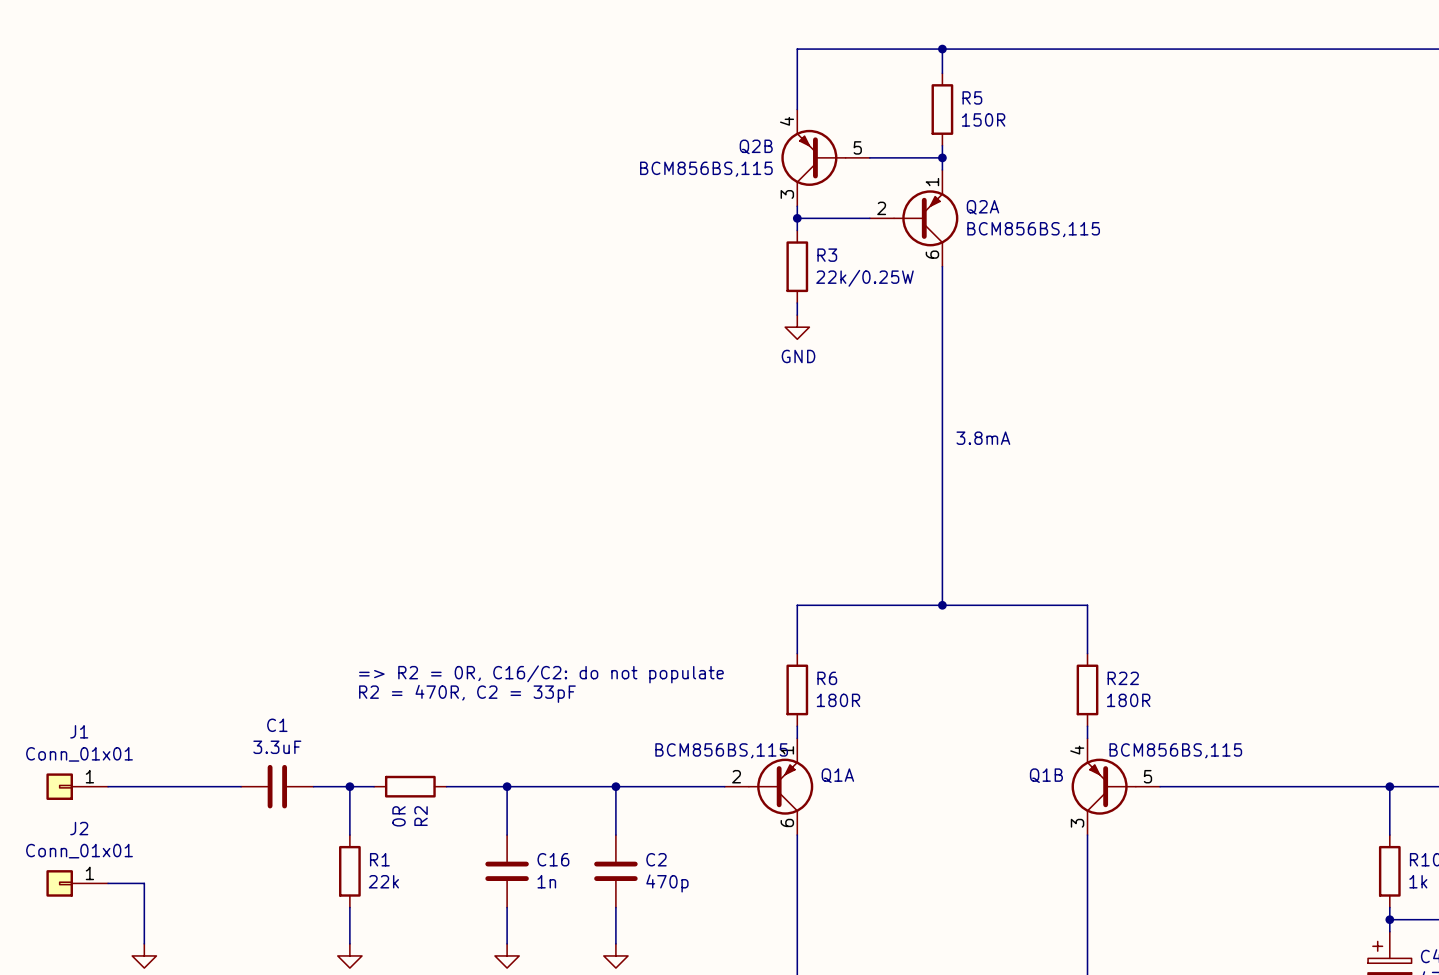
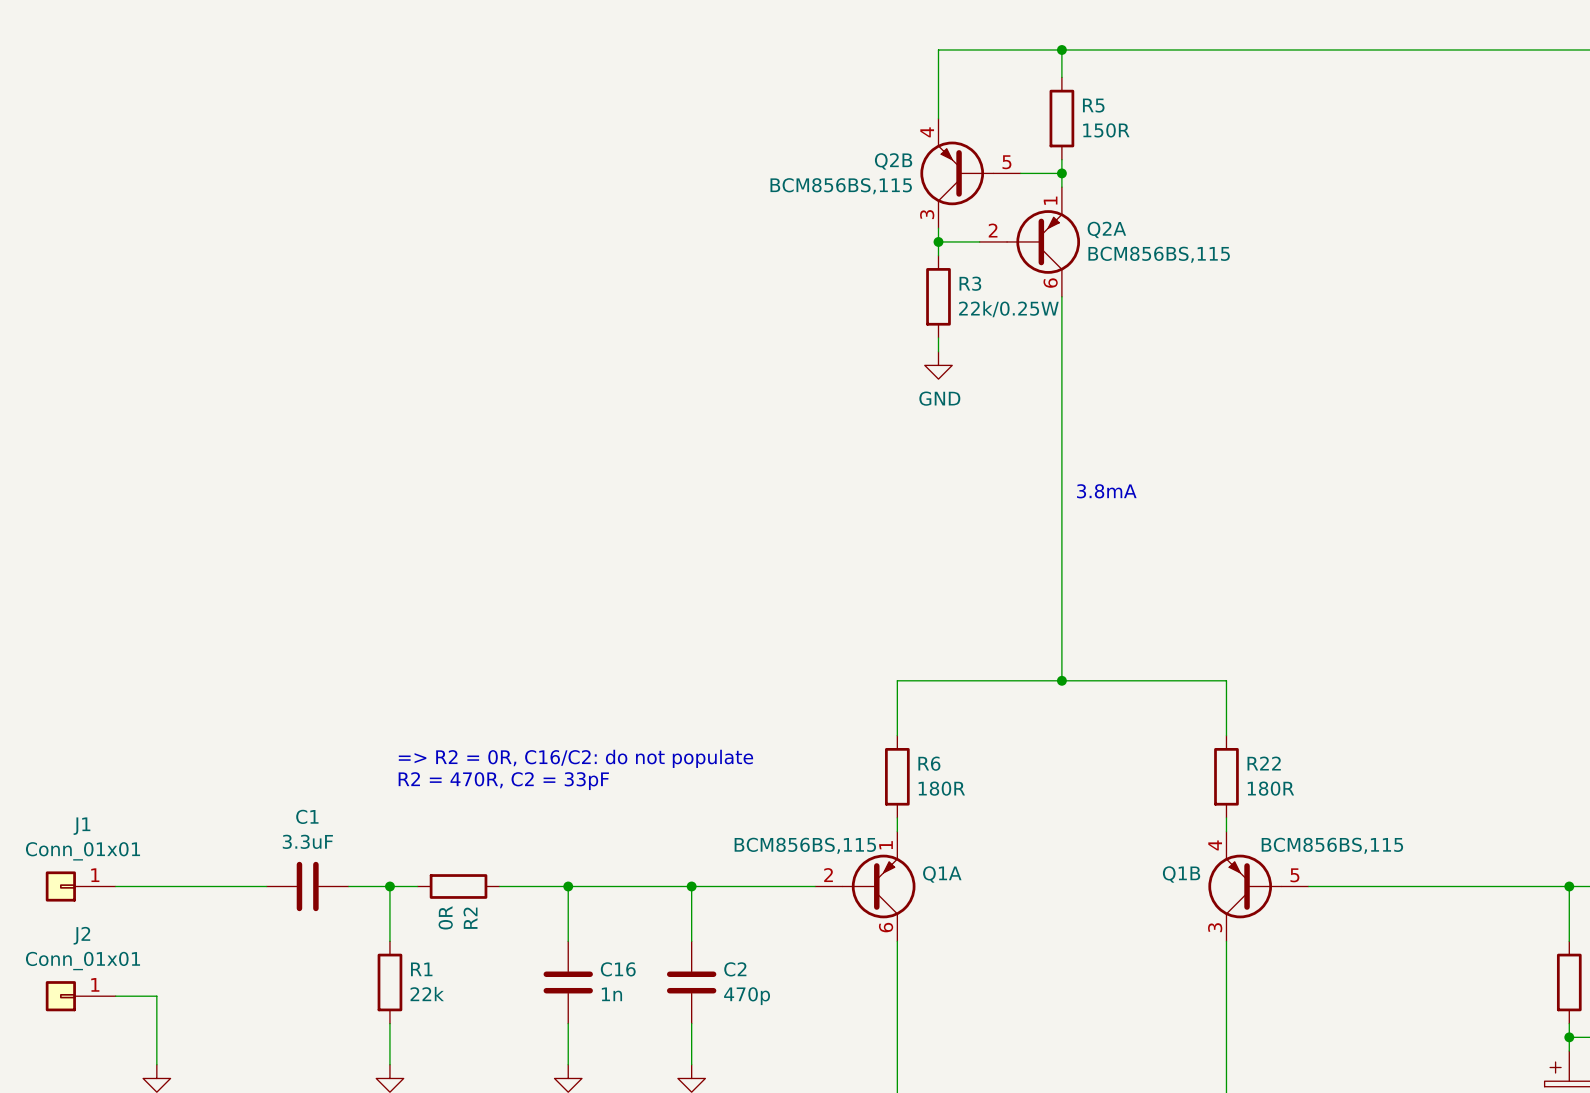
wire: (833, 49) (797, 49) (797, 109) -> (938, 49) (938, 118)
Q2B position: (825, 157) -> (970, 173)
wire: (797, 206) (797, 230) -> (938, 228) (938, 255)
wire: (797, 218) (833, 218) -> none
junction position: (797, 218) -> (938, 241)
R3 position: (797, 266) -> (938, 296)
wire: (797, 302) (797, 315) -> (938, 337) (938, 351)
power symbol position: GND (797, 327) -> GND (938, 365)

